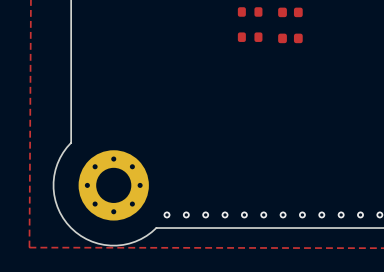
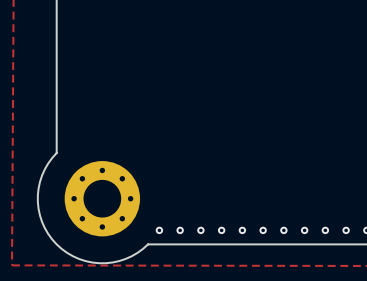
part: (250, 11) -> none
part: (290, 12) -> none
part: (250, 37) -> none
part: (290, 38) -> none

